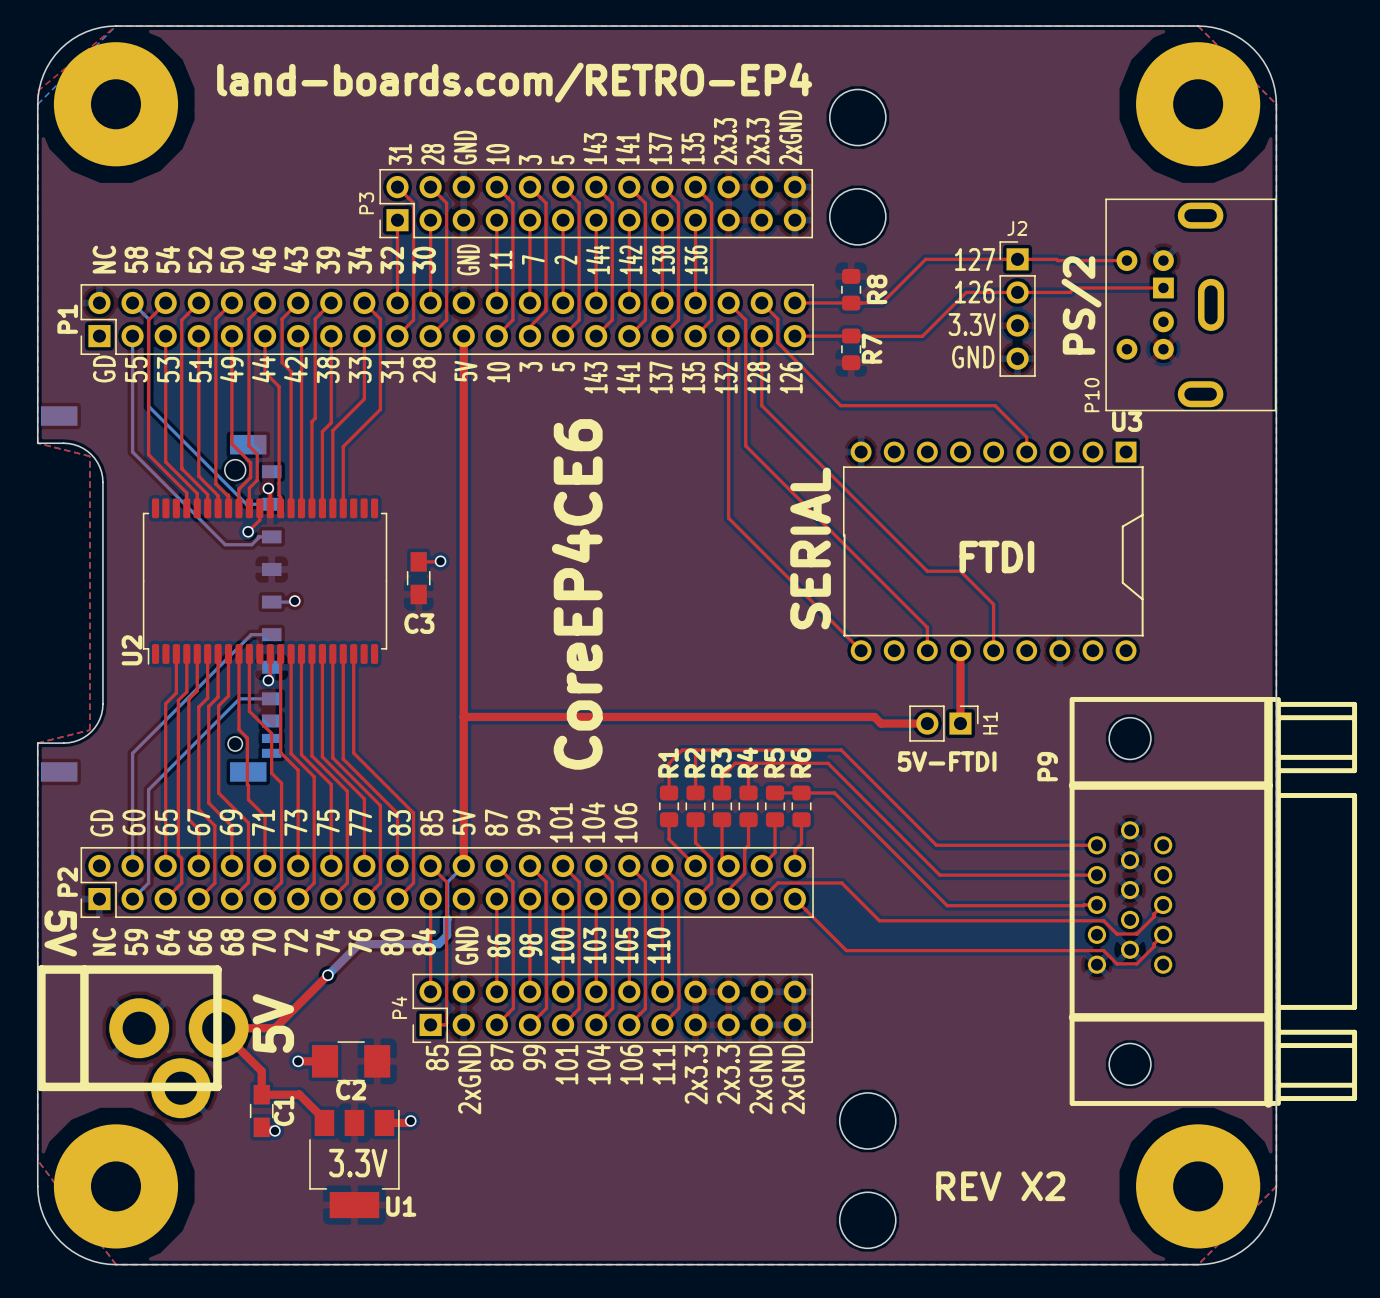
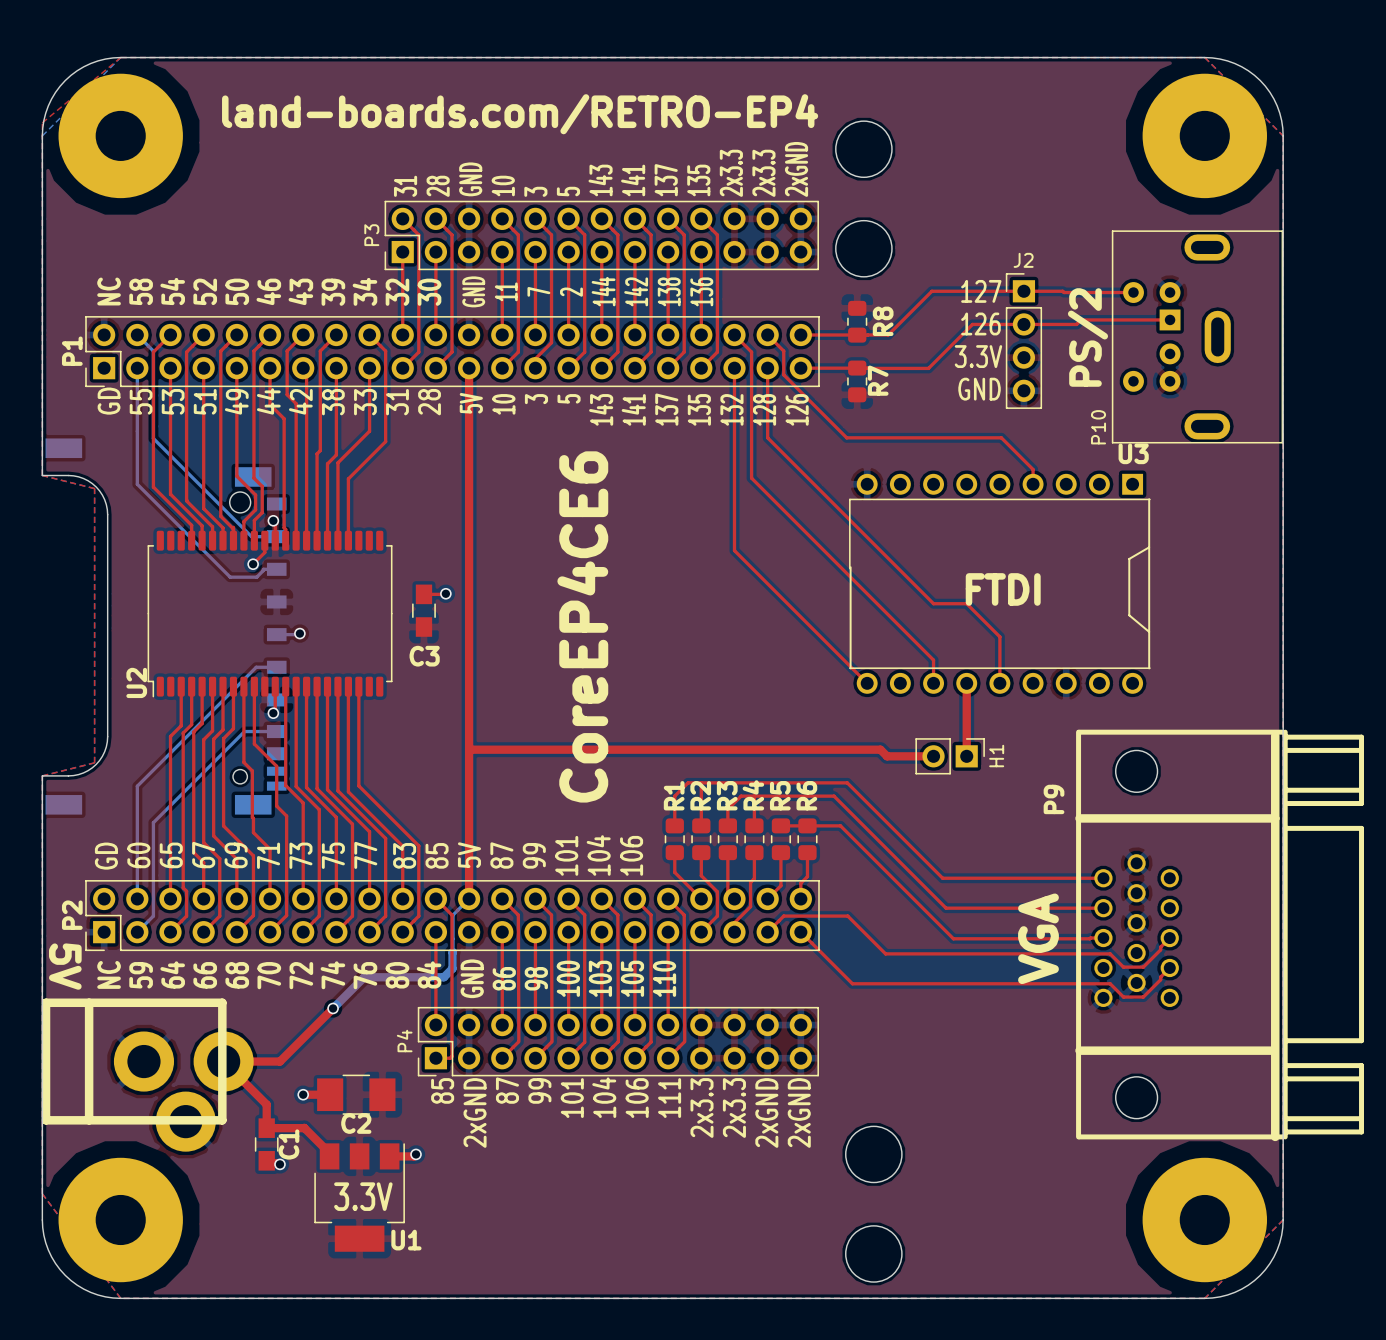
P9 value: SERIAL (810, 548) -> VGA (1038, 938)
text: 5V-FTDI (947, 761) -> none
text: 5V (273, 1023) -> none
text: REV X2 (1000, 1186) -> none

